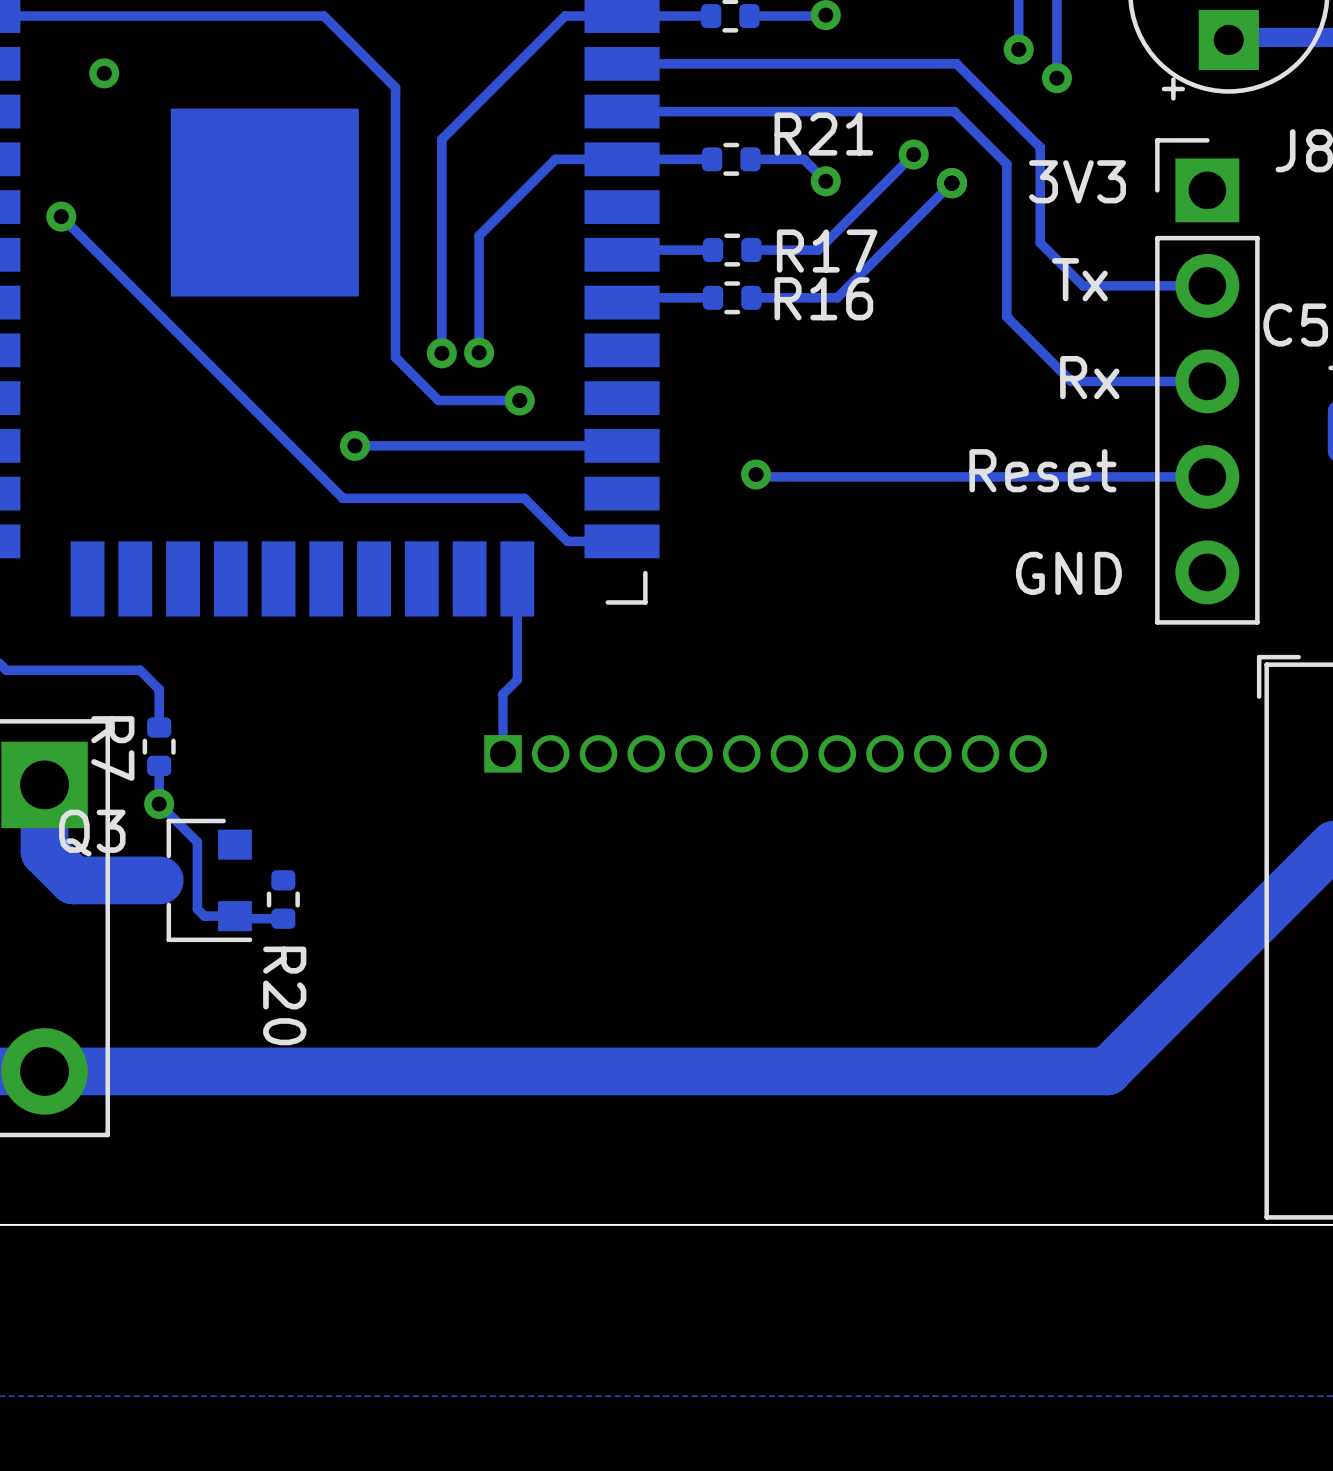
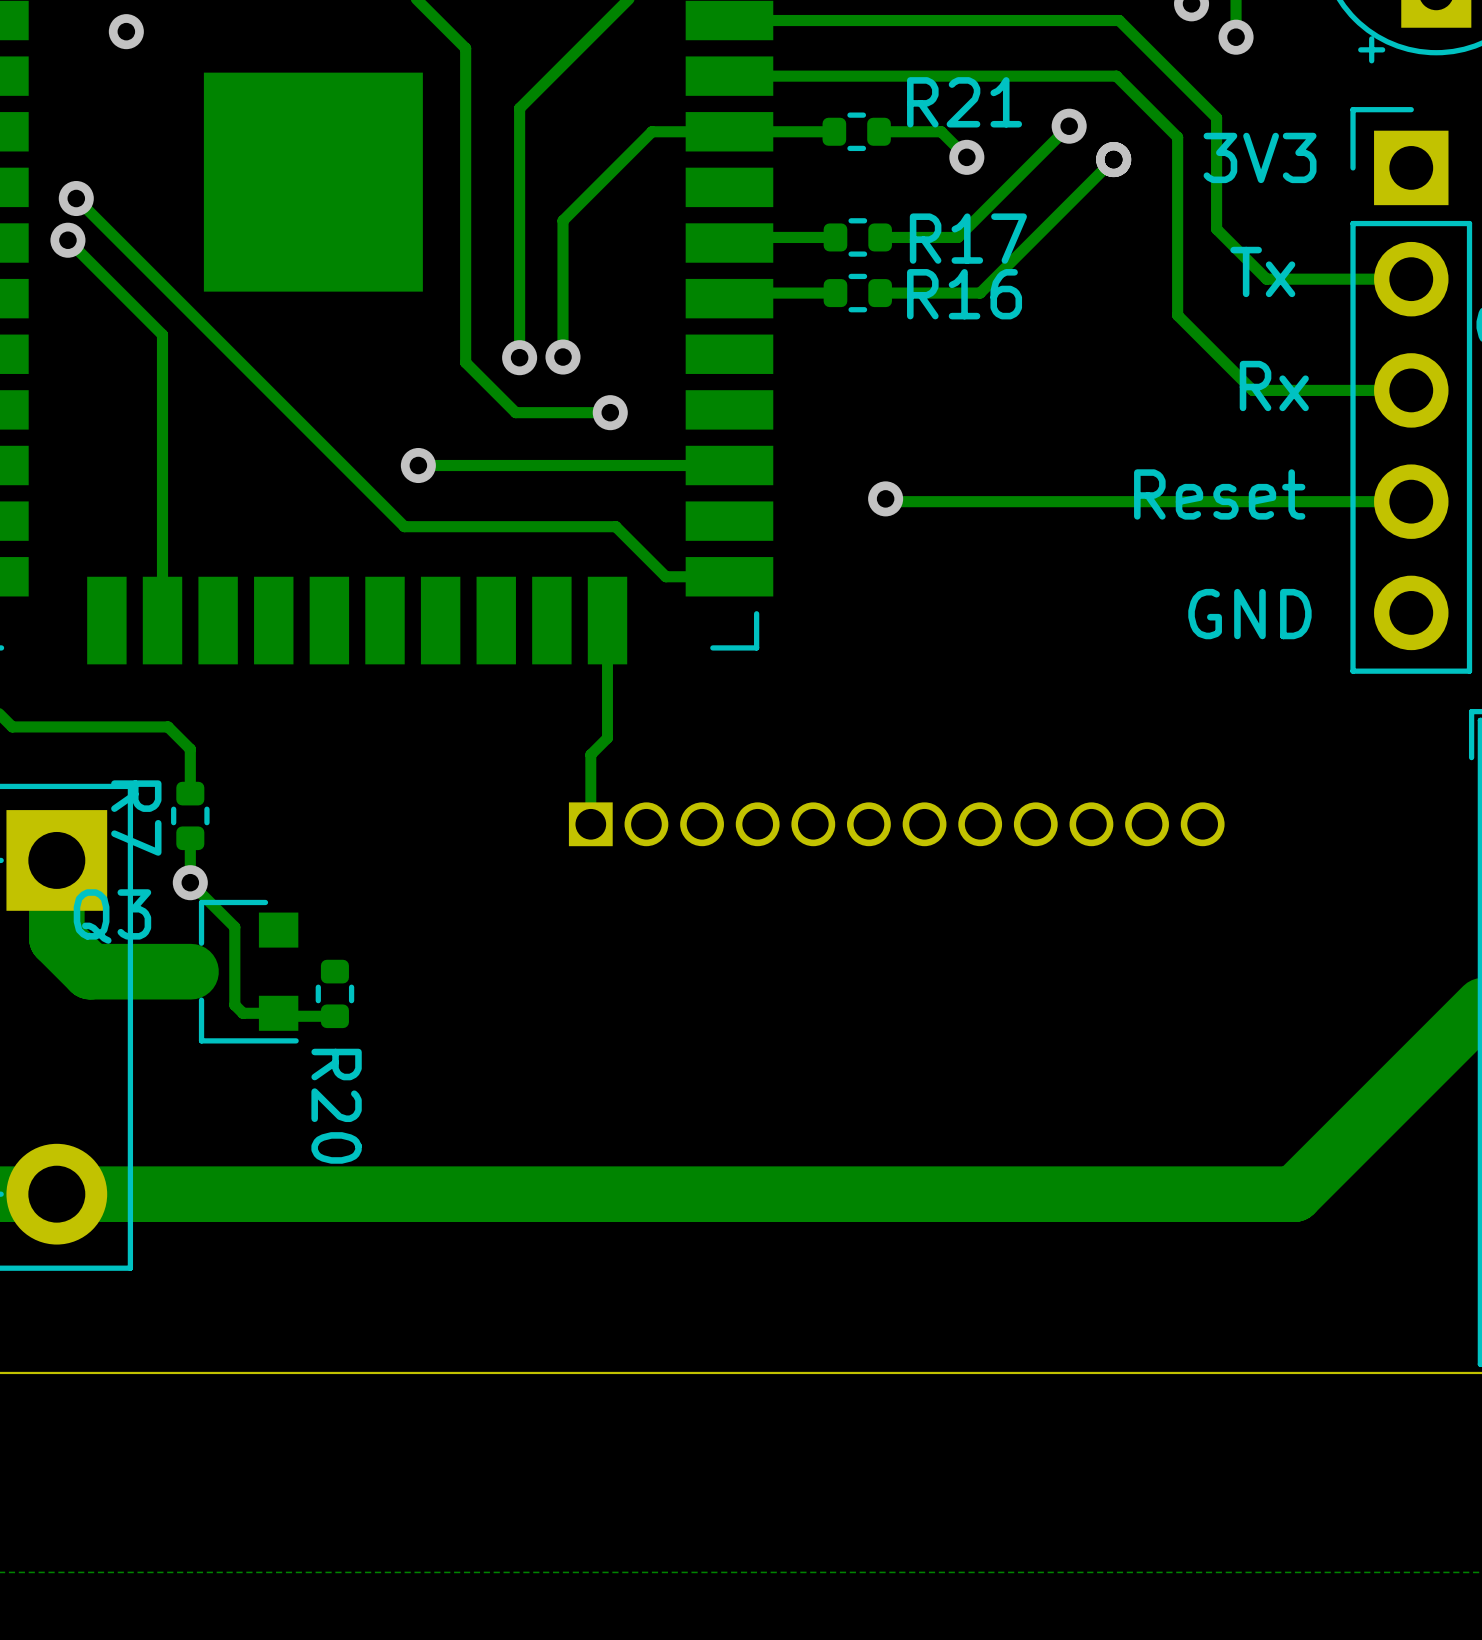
track: none -> (67, 240) (162, 334) (162, 620)
via: none -> (67, 240)

